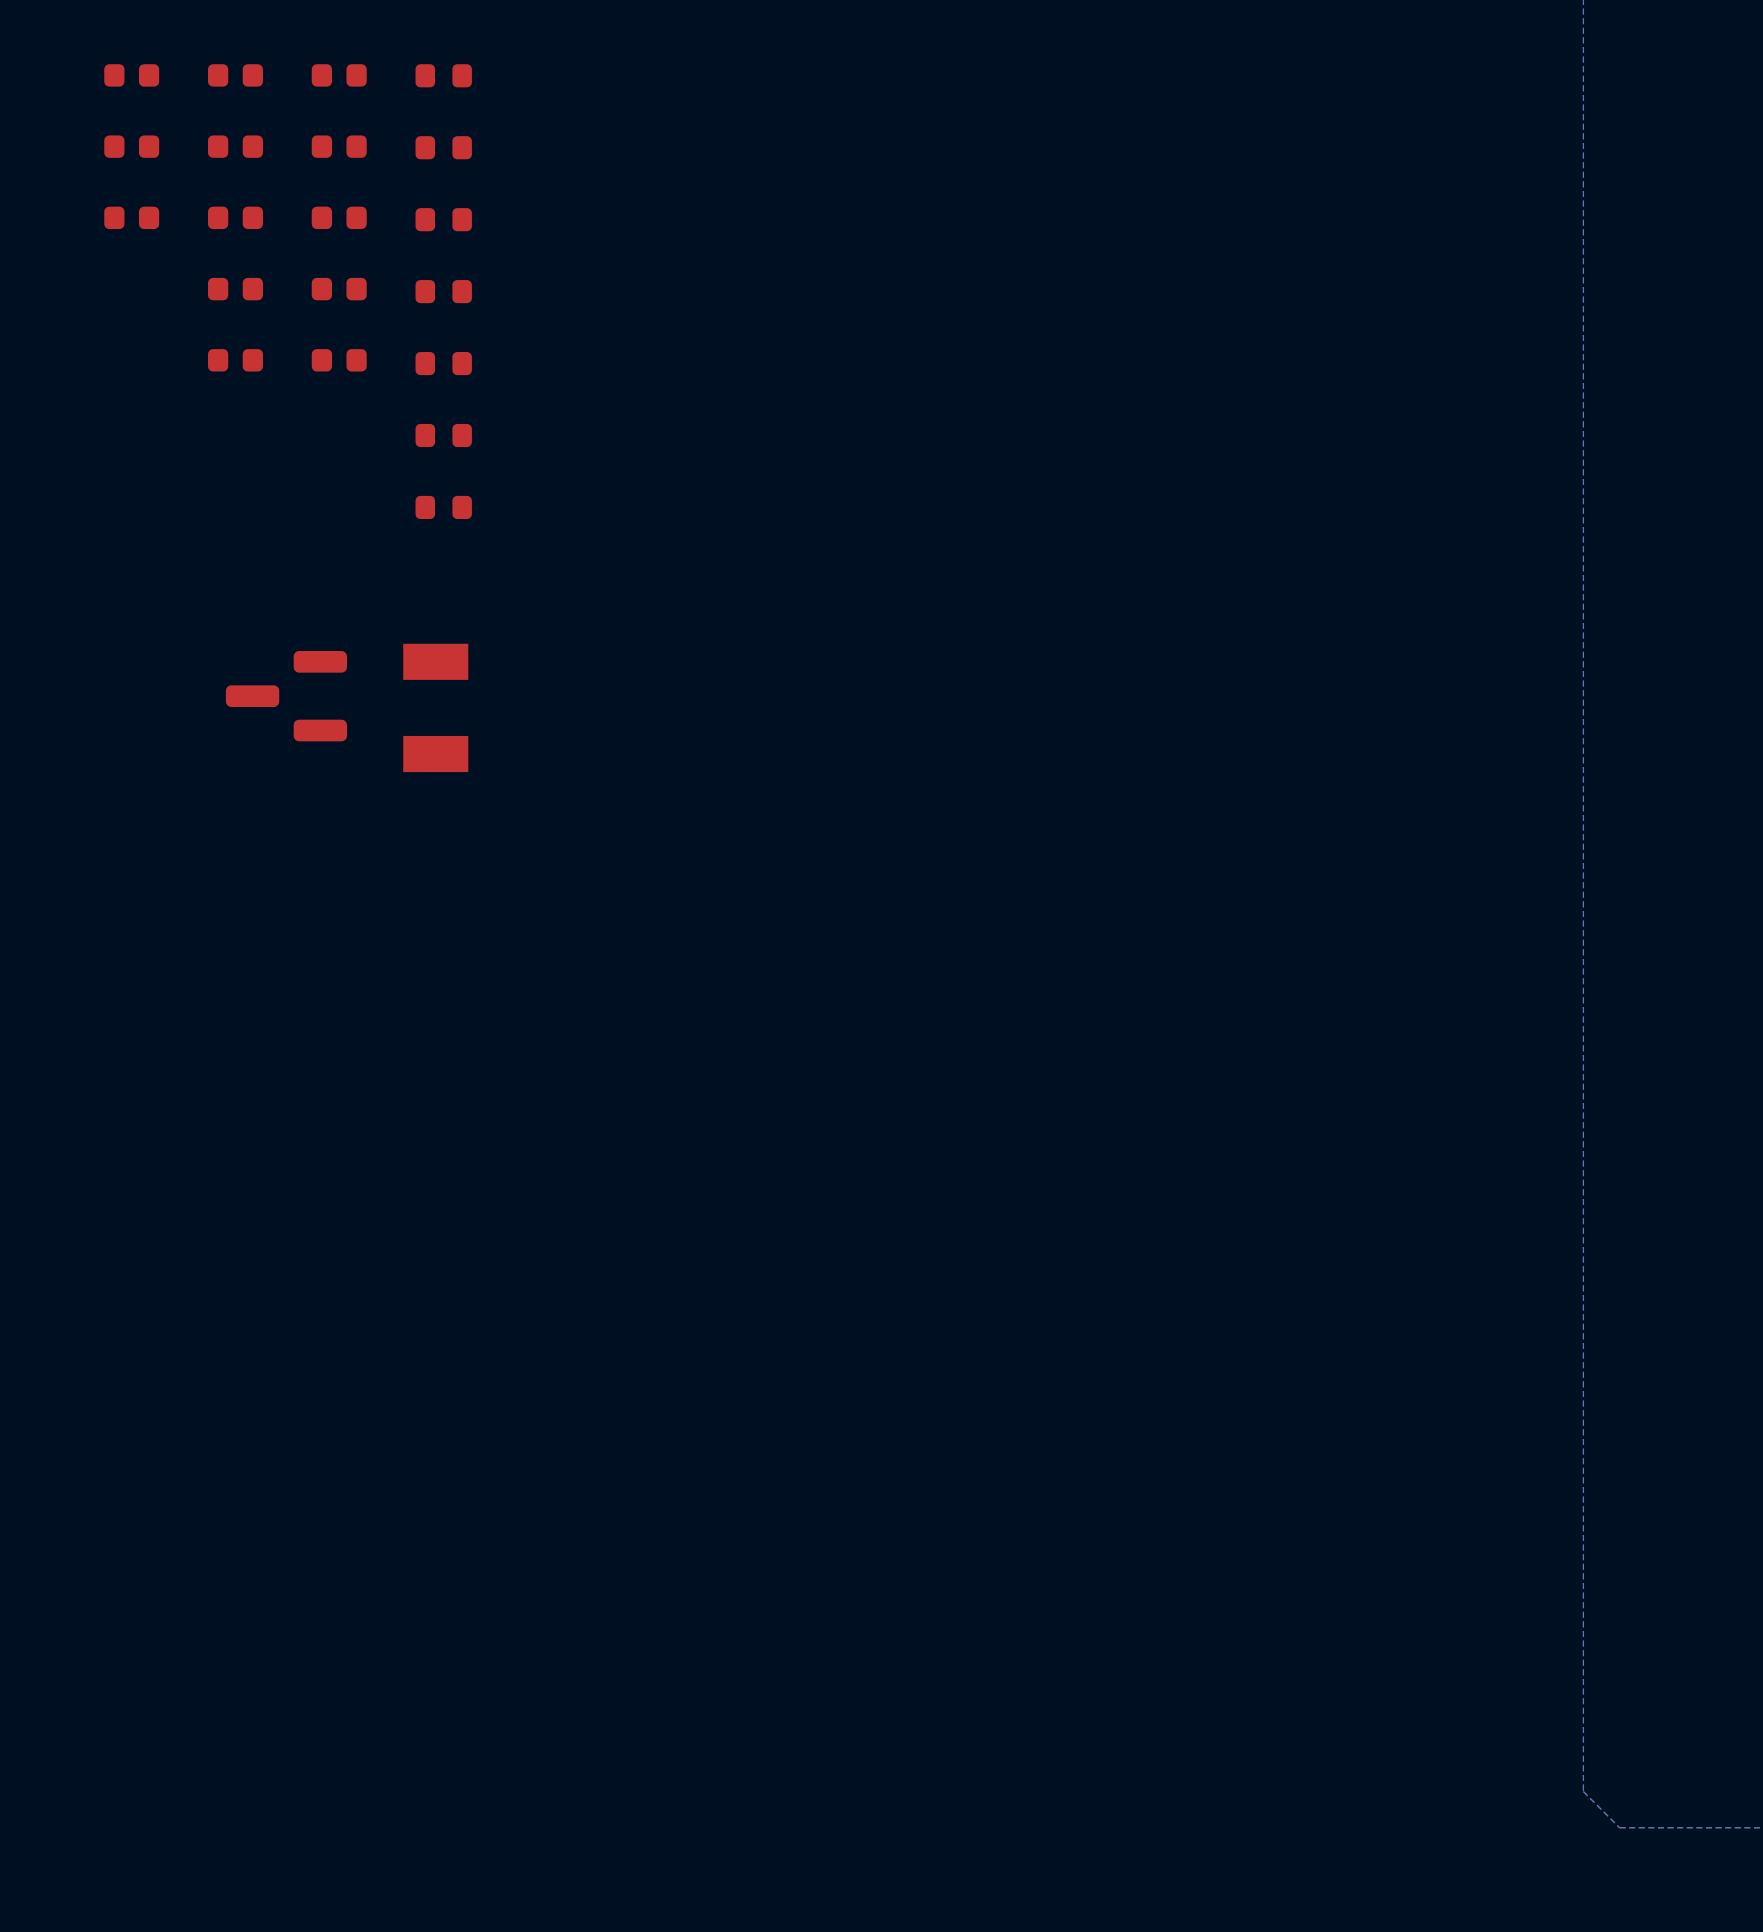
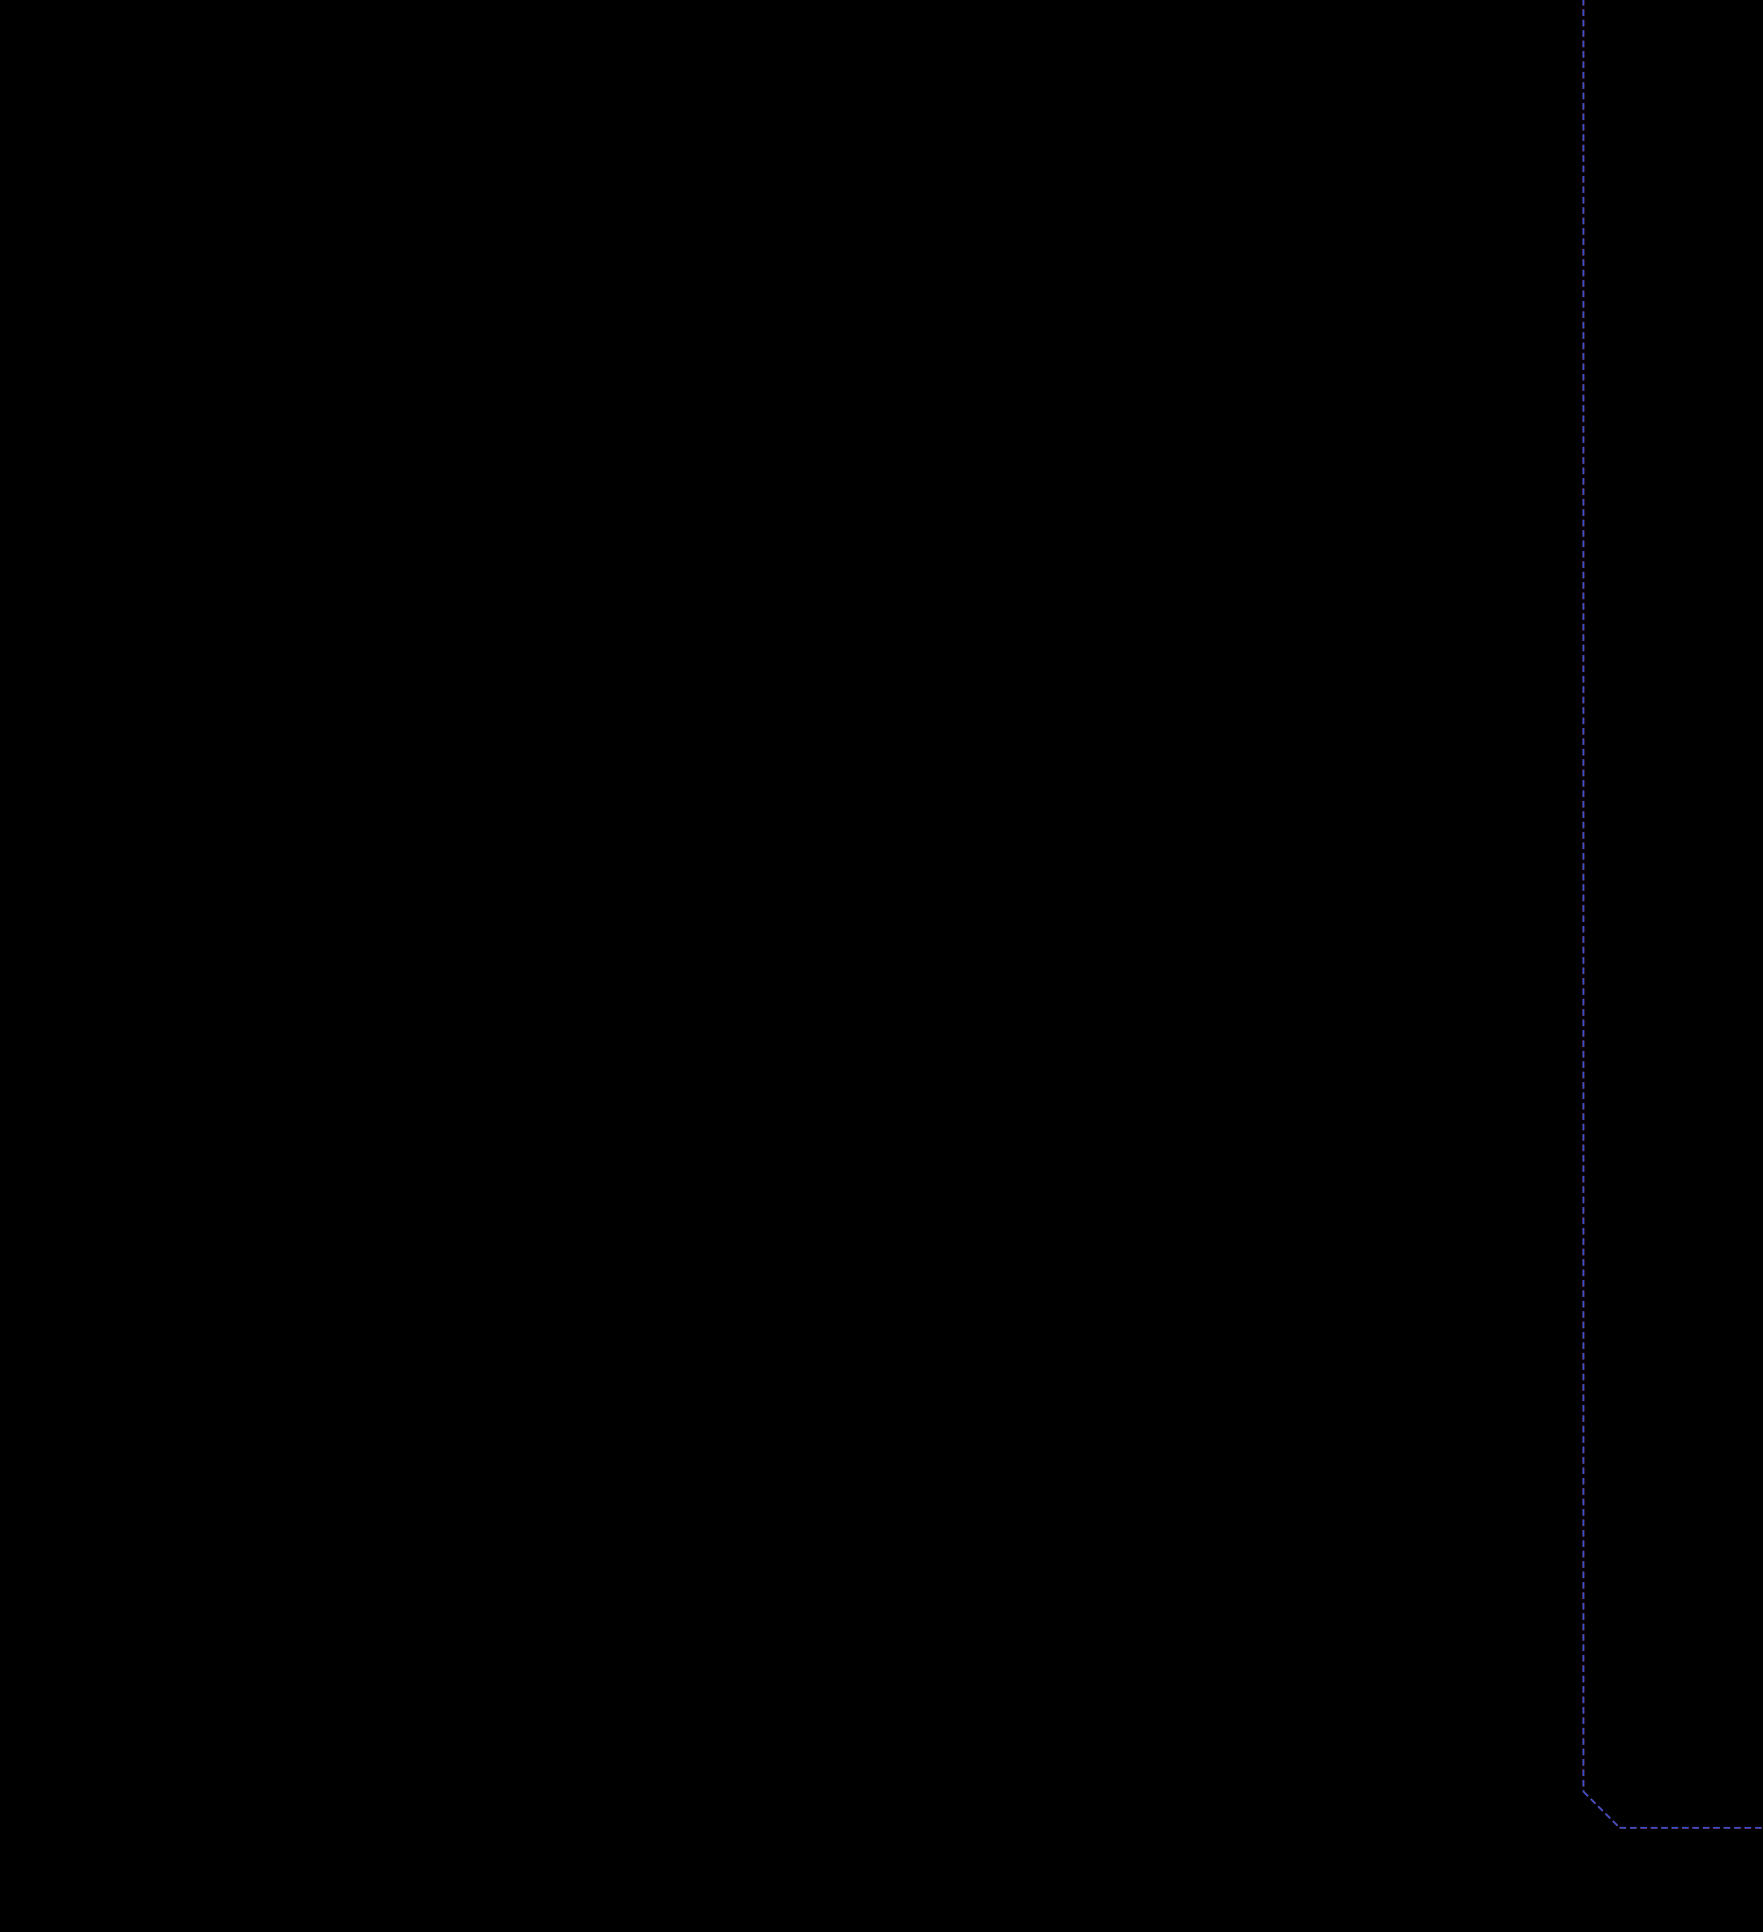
part: (131, 75) -> none
part: (235, 75) -> none
part: (339, 75) -> none
part: (443, 75) -> none
part: (131, 146) -> none
part: (235, 146) -> none
part: (339, 146) -> none
part: (443, 147) -> none
part: (131, 217) -> none
part: (235, 217) -> none
part: (339, 217) -> none
part: (443, 219) -> none
part: (235, 289) -> none
part: (339, 289) -> none
part: (443, 291) -> none
part: (235, 360) -> none
part: (339, 360) -> none
part: (443, 363) -> none
part: (443, 435) -> none
part: (443, 507) -> none
part: (435, 661) -> none
part: (286, 696) -> none
part: (435, 754) -> none

